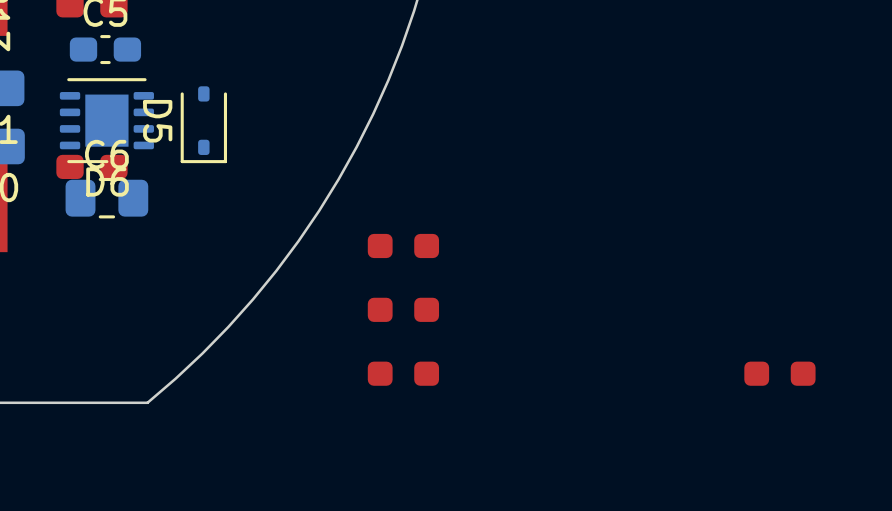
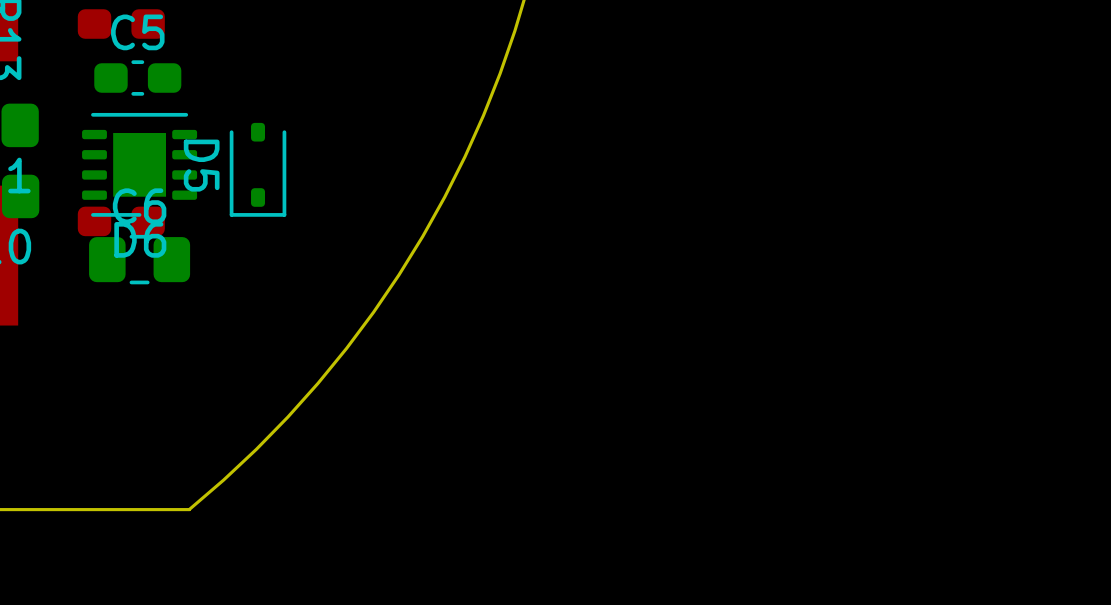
part: (403, 245) -> none
part: (403, 309) -> none
part: (403, 373) -> none
part: (779, 373) -> none

